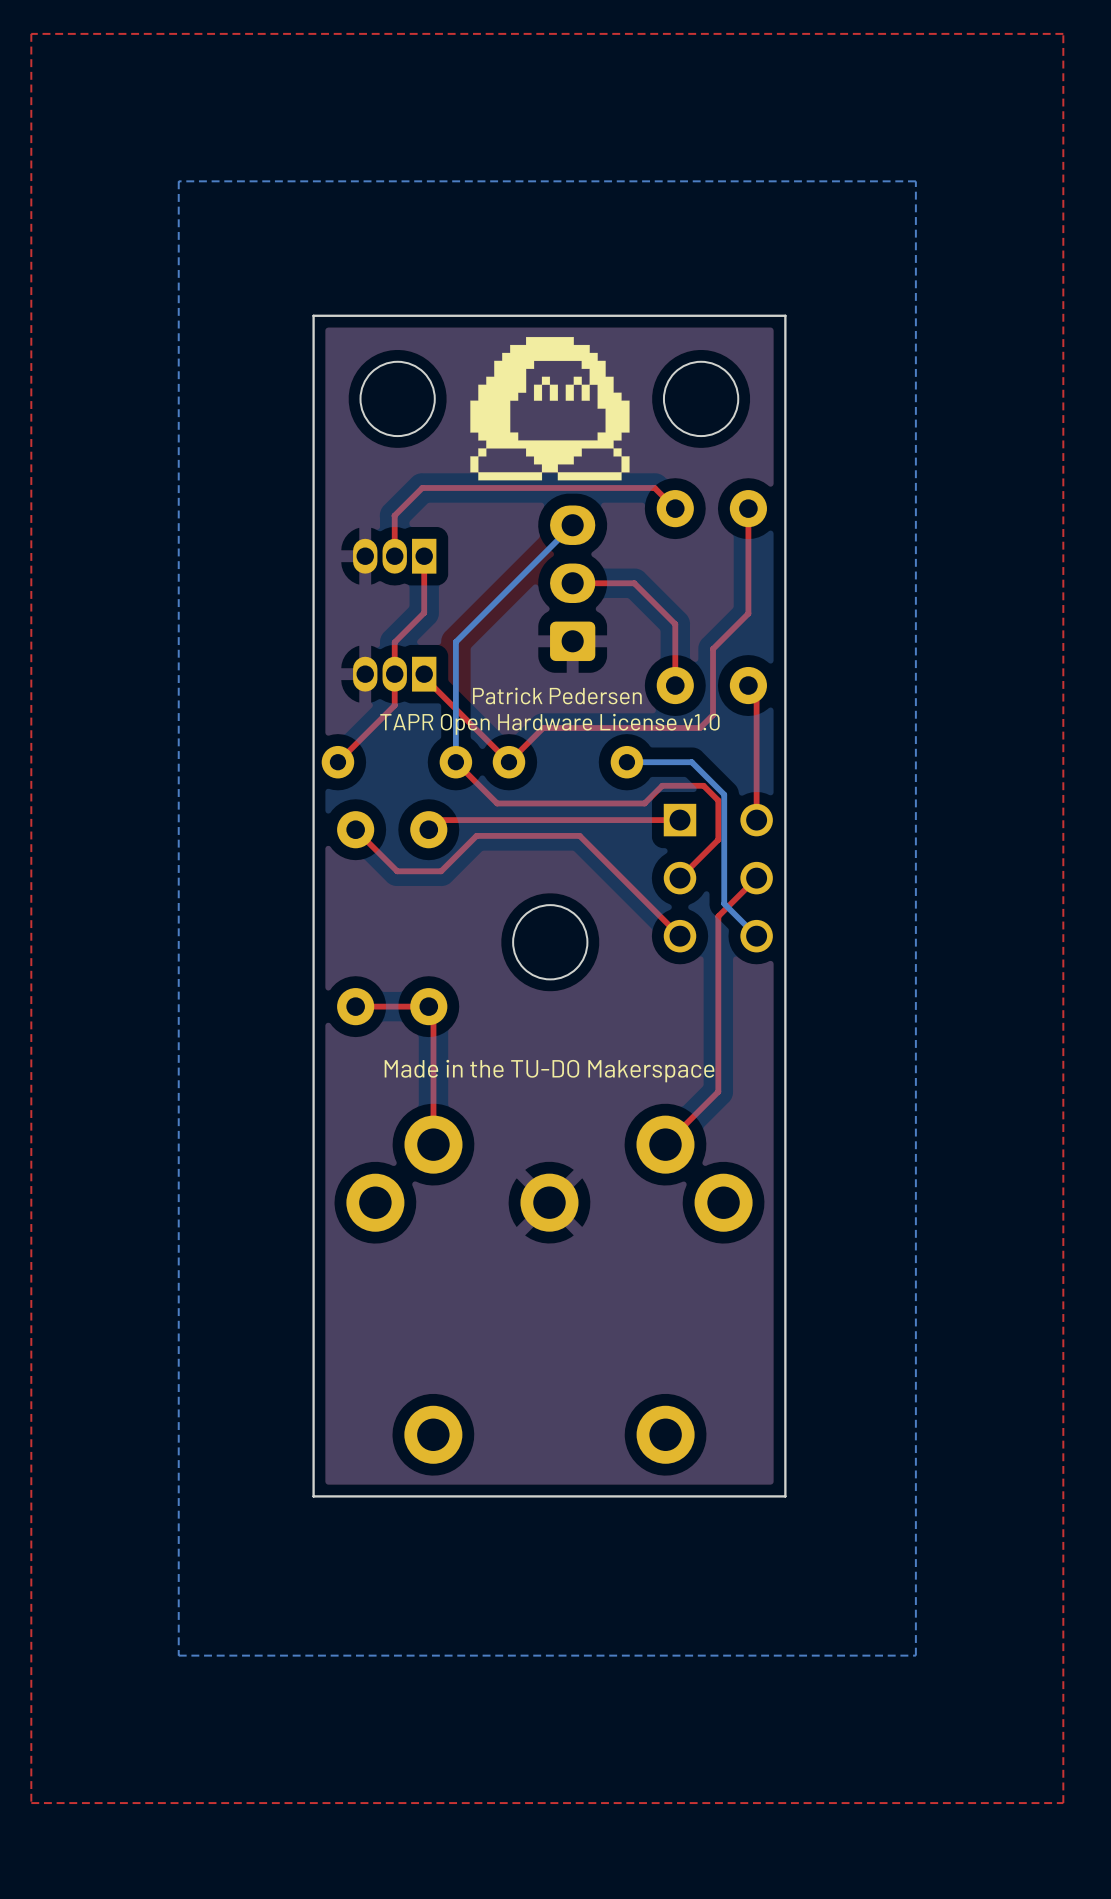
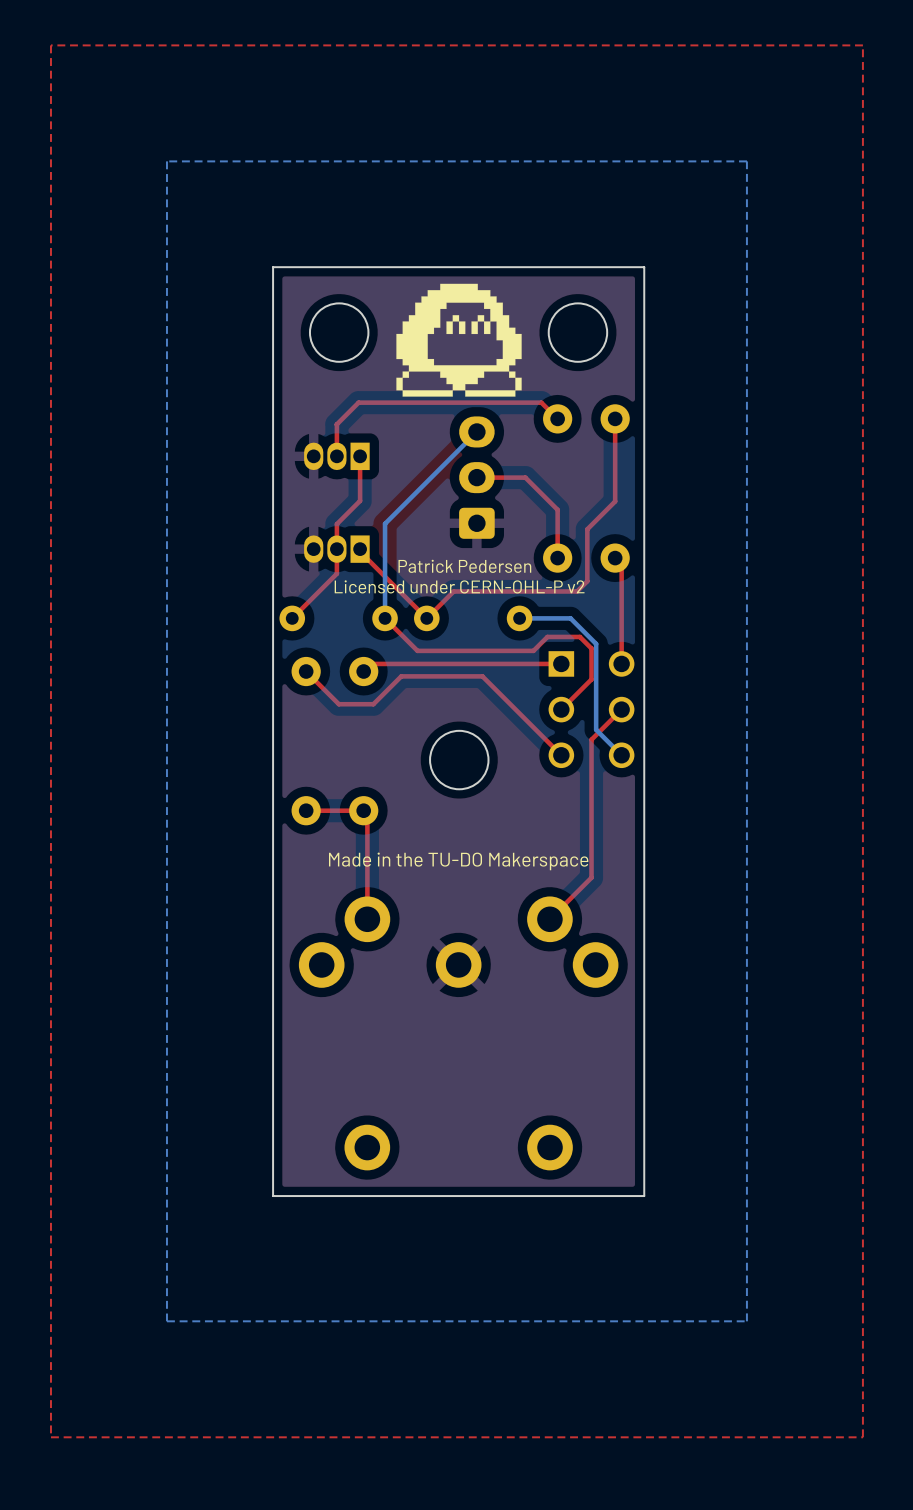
text: TAPR Open Hardware License v1.0 (549, 724) -> Licensed under CERN-OHL-P v2 (459, 586)

